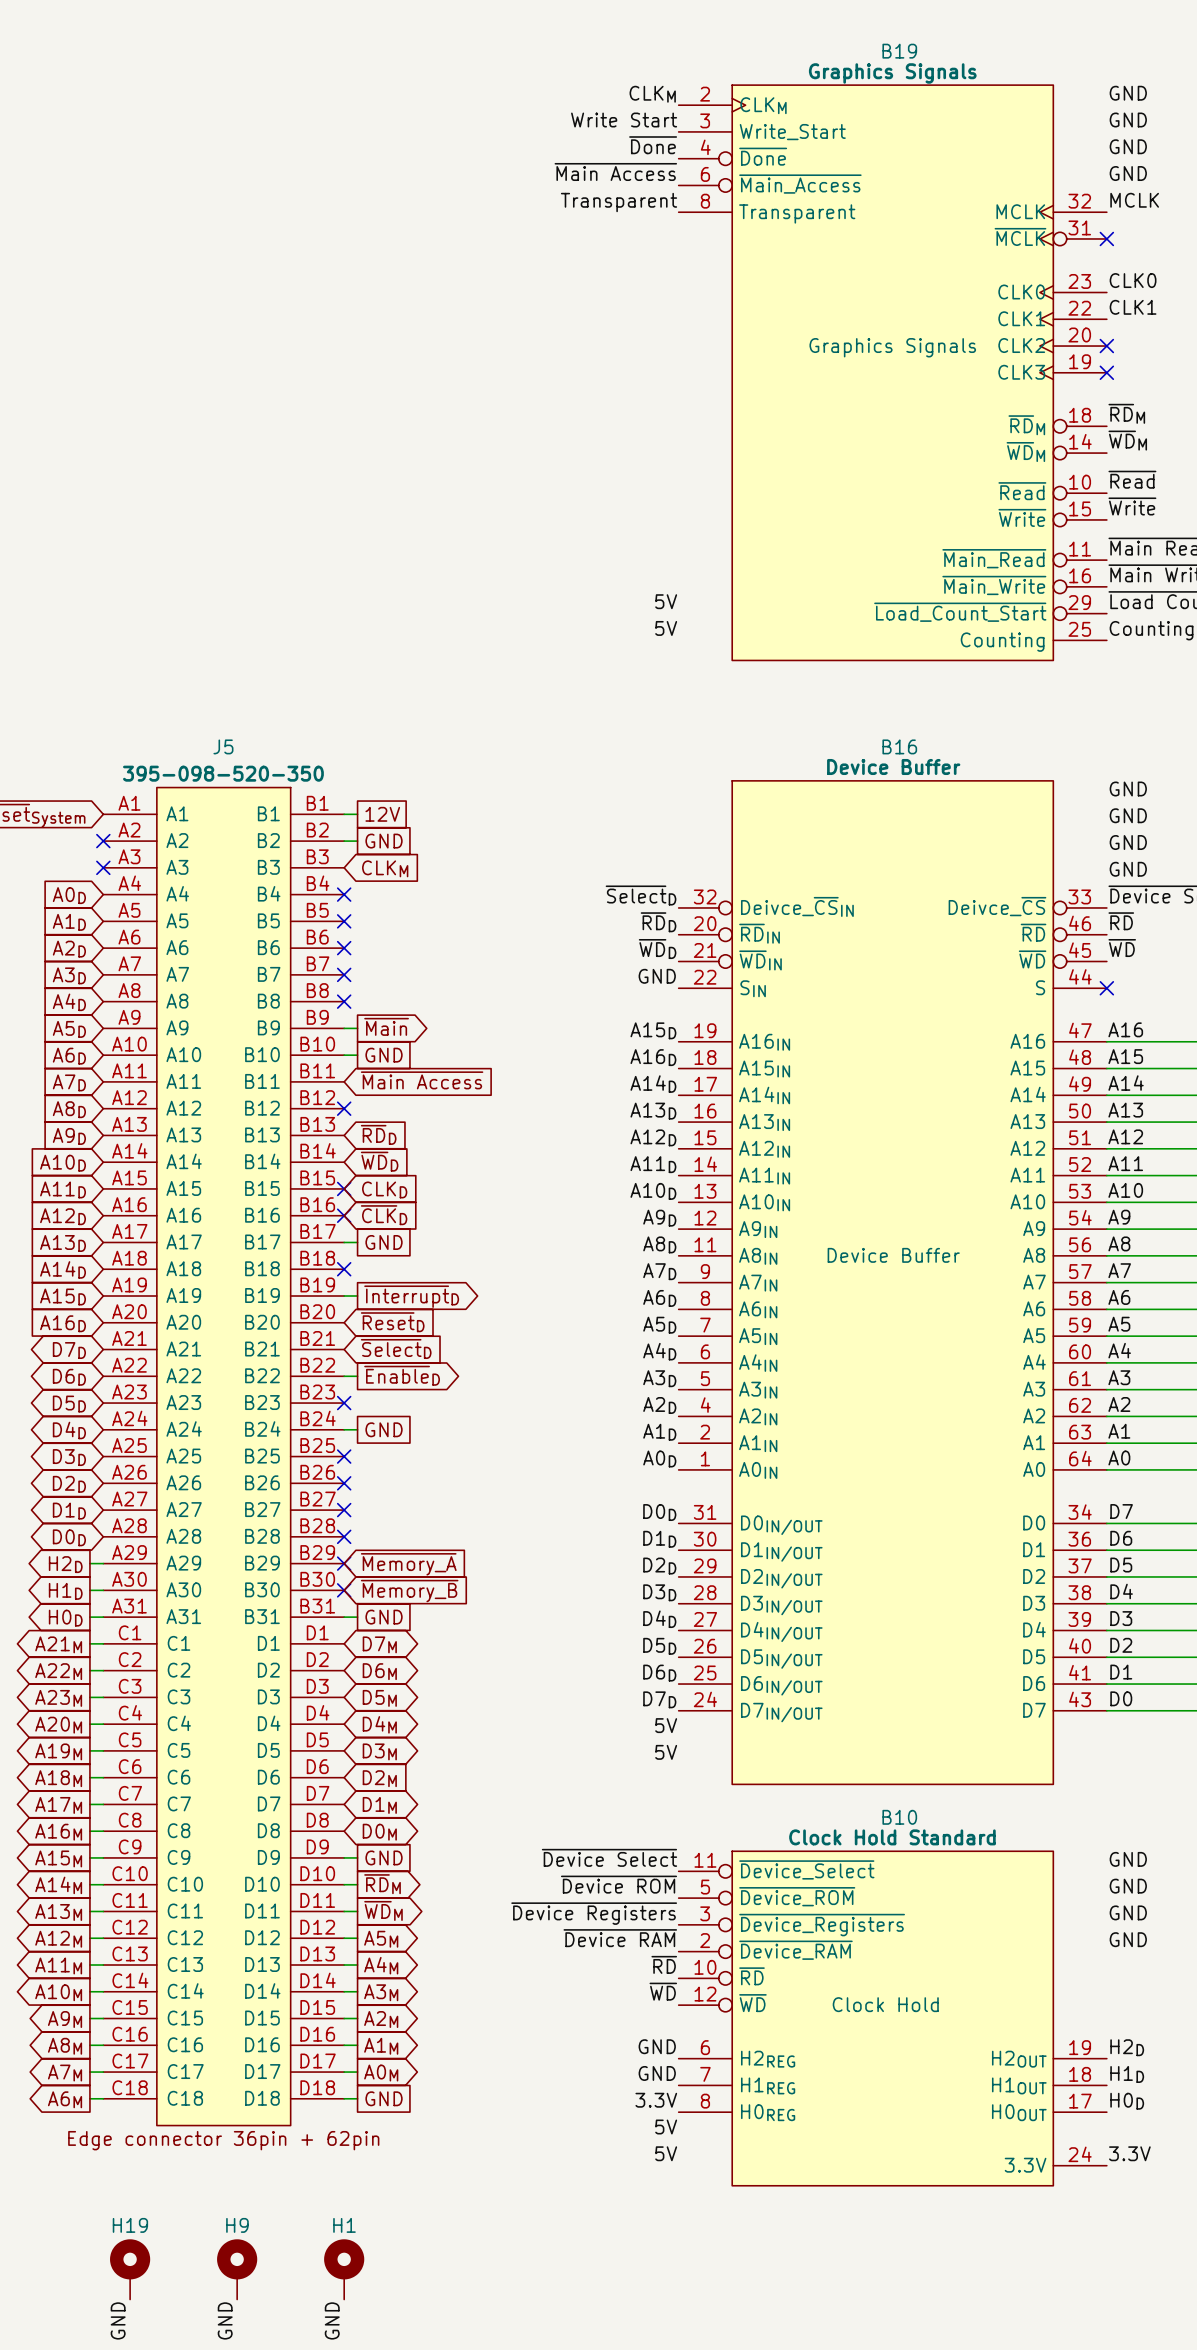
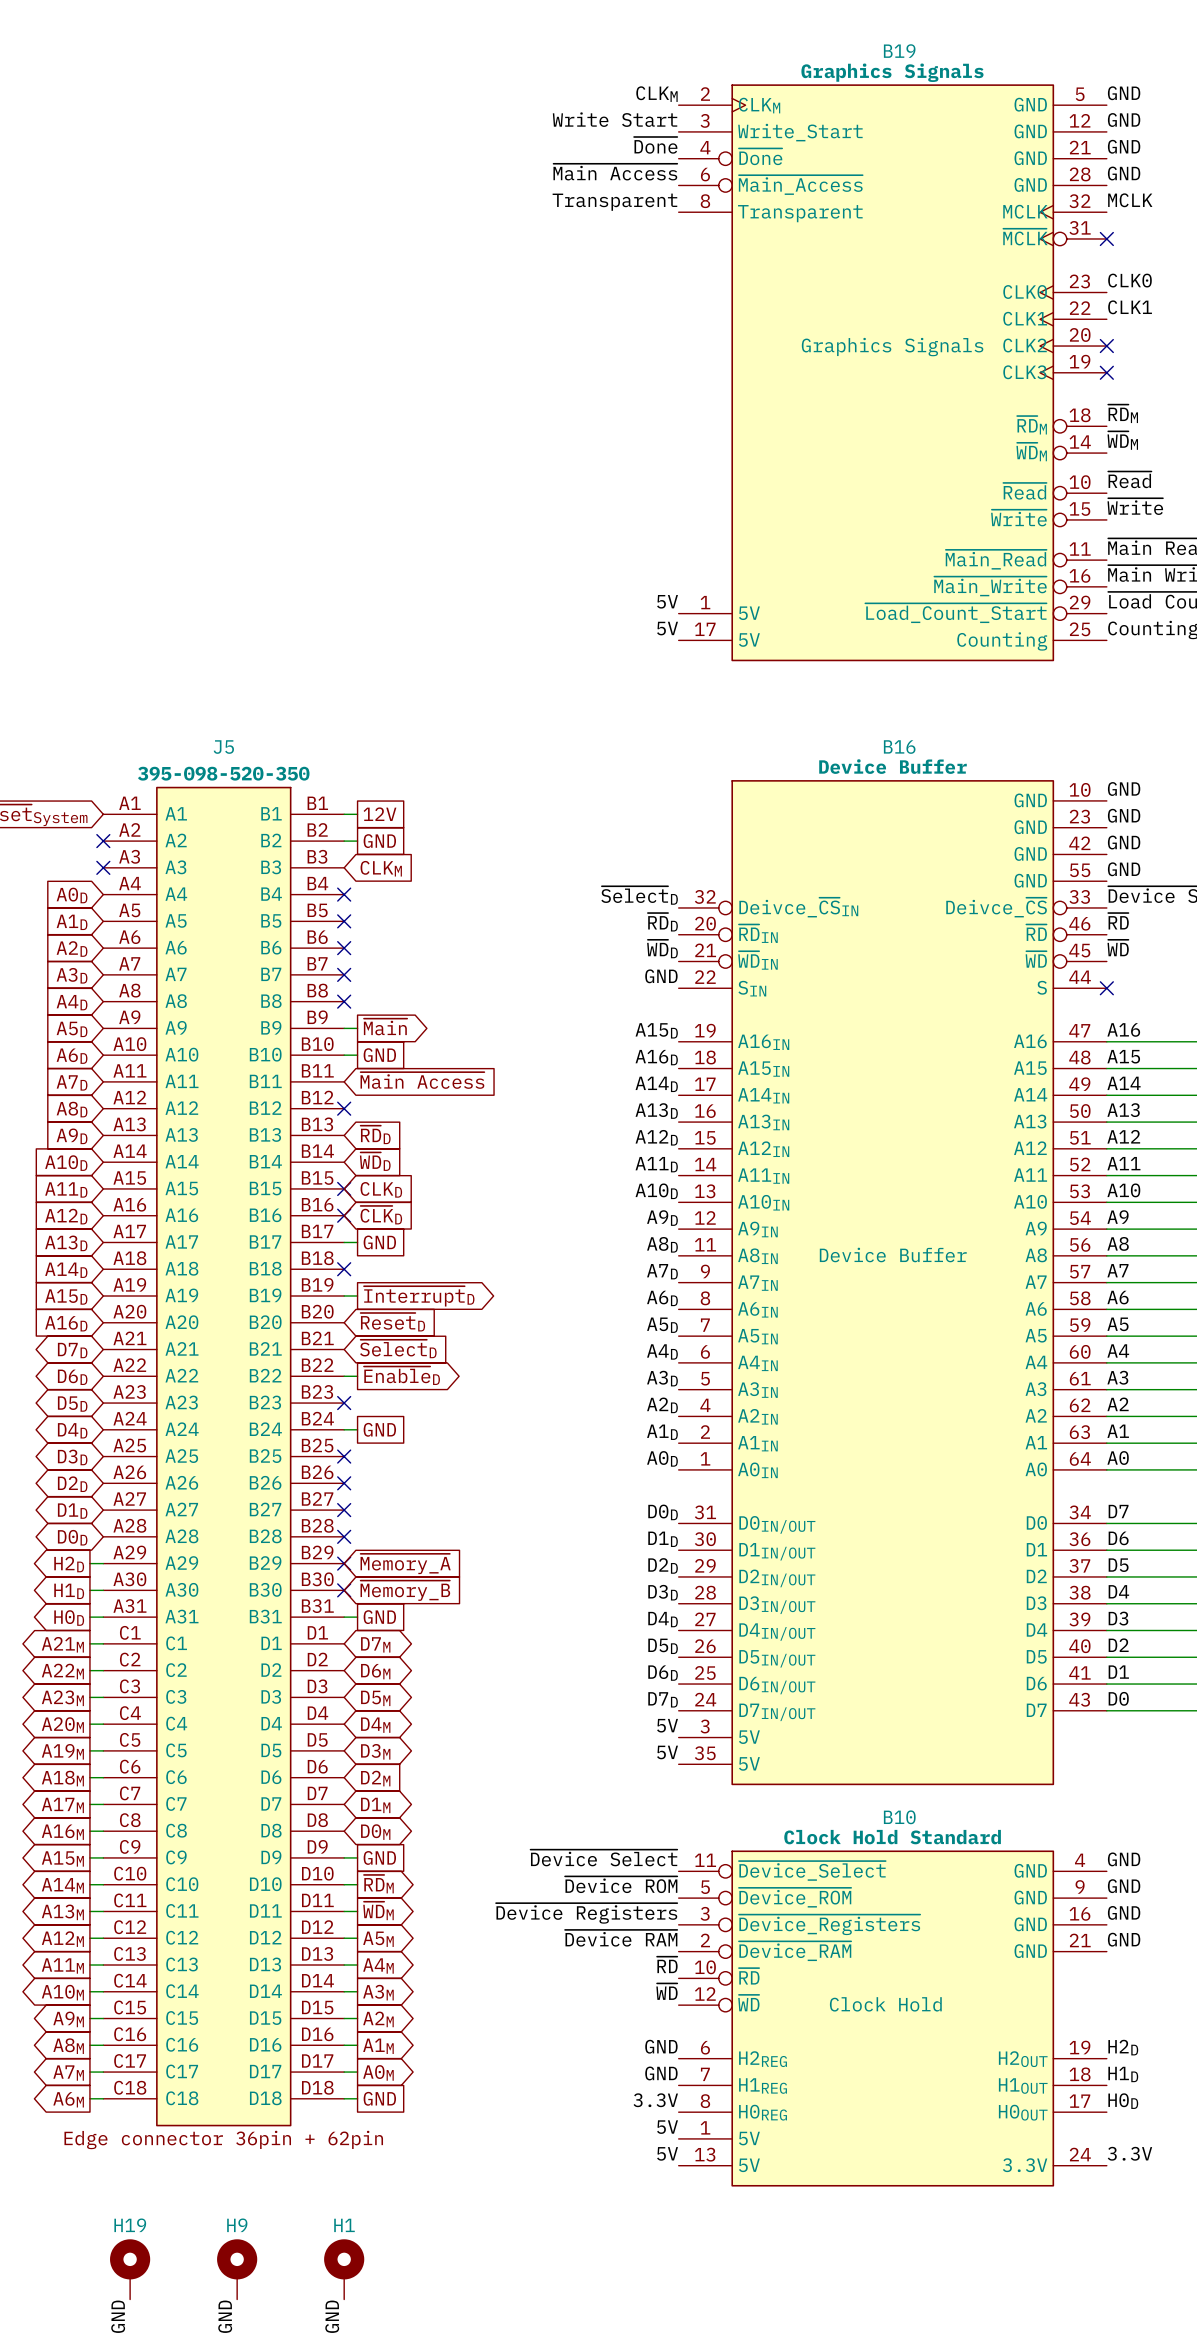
B19 symbol: [678, 84, 1107, 662] -> [678, 84, 1107, 662]
B16 symbol: [678, 780, 1107, 1786] -> [678, 780, 1107, 1786]
B10 symbol: [678, 1850, 1107, 2187] -> [678, 1850, 1107, 2187]

